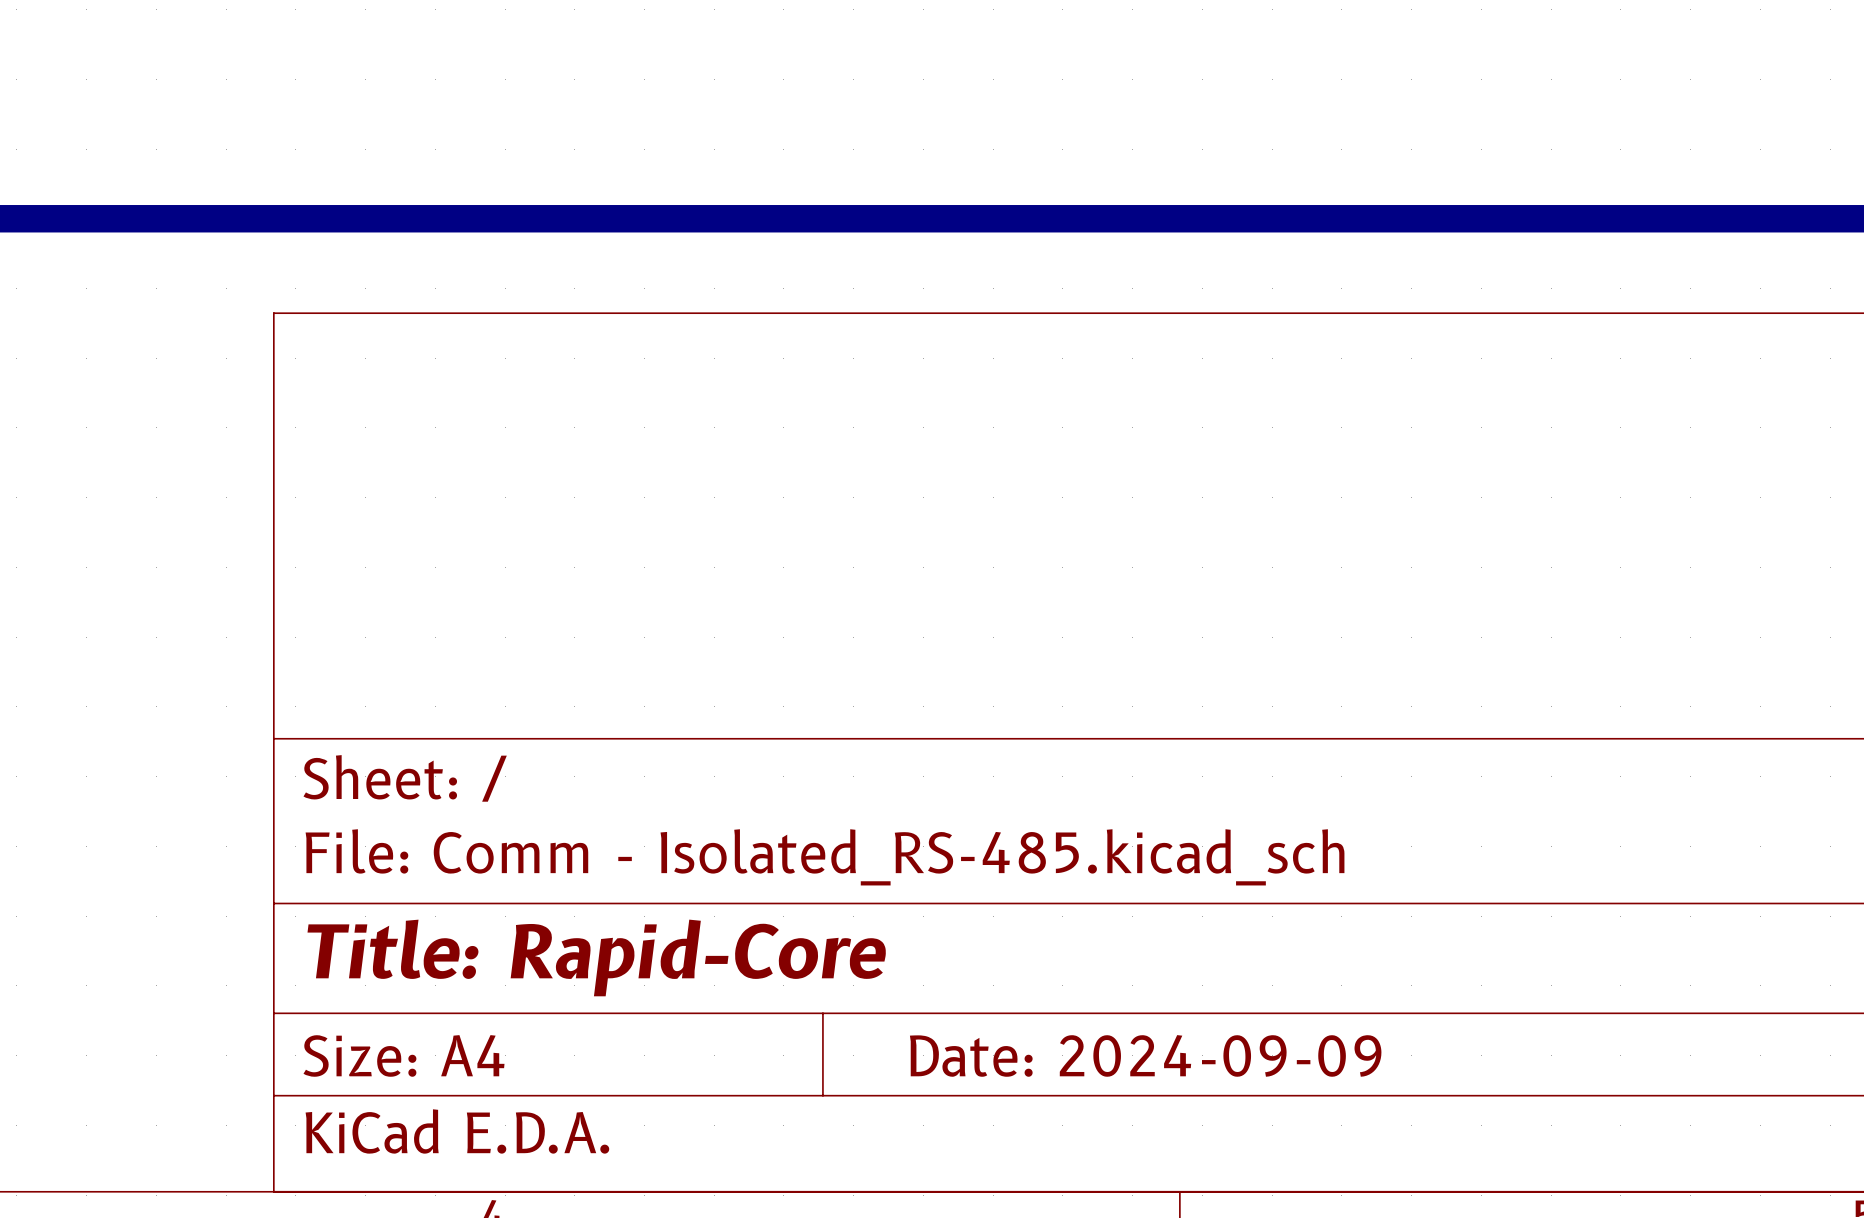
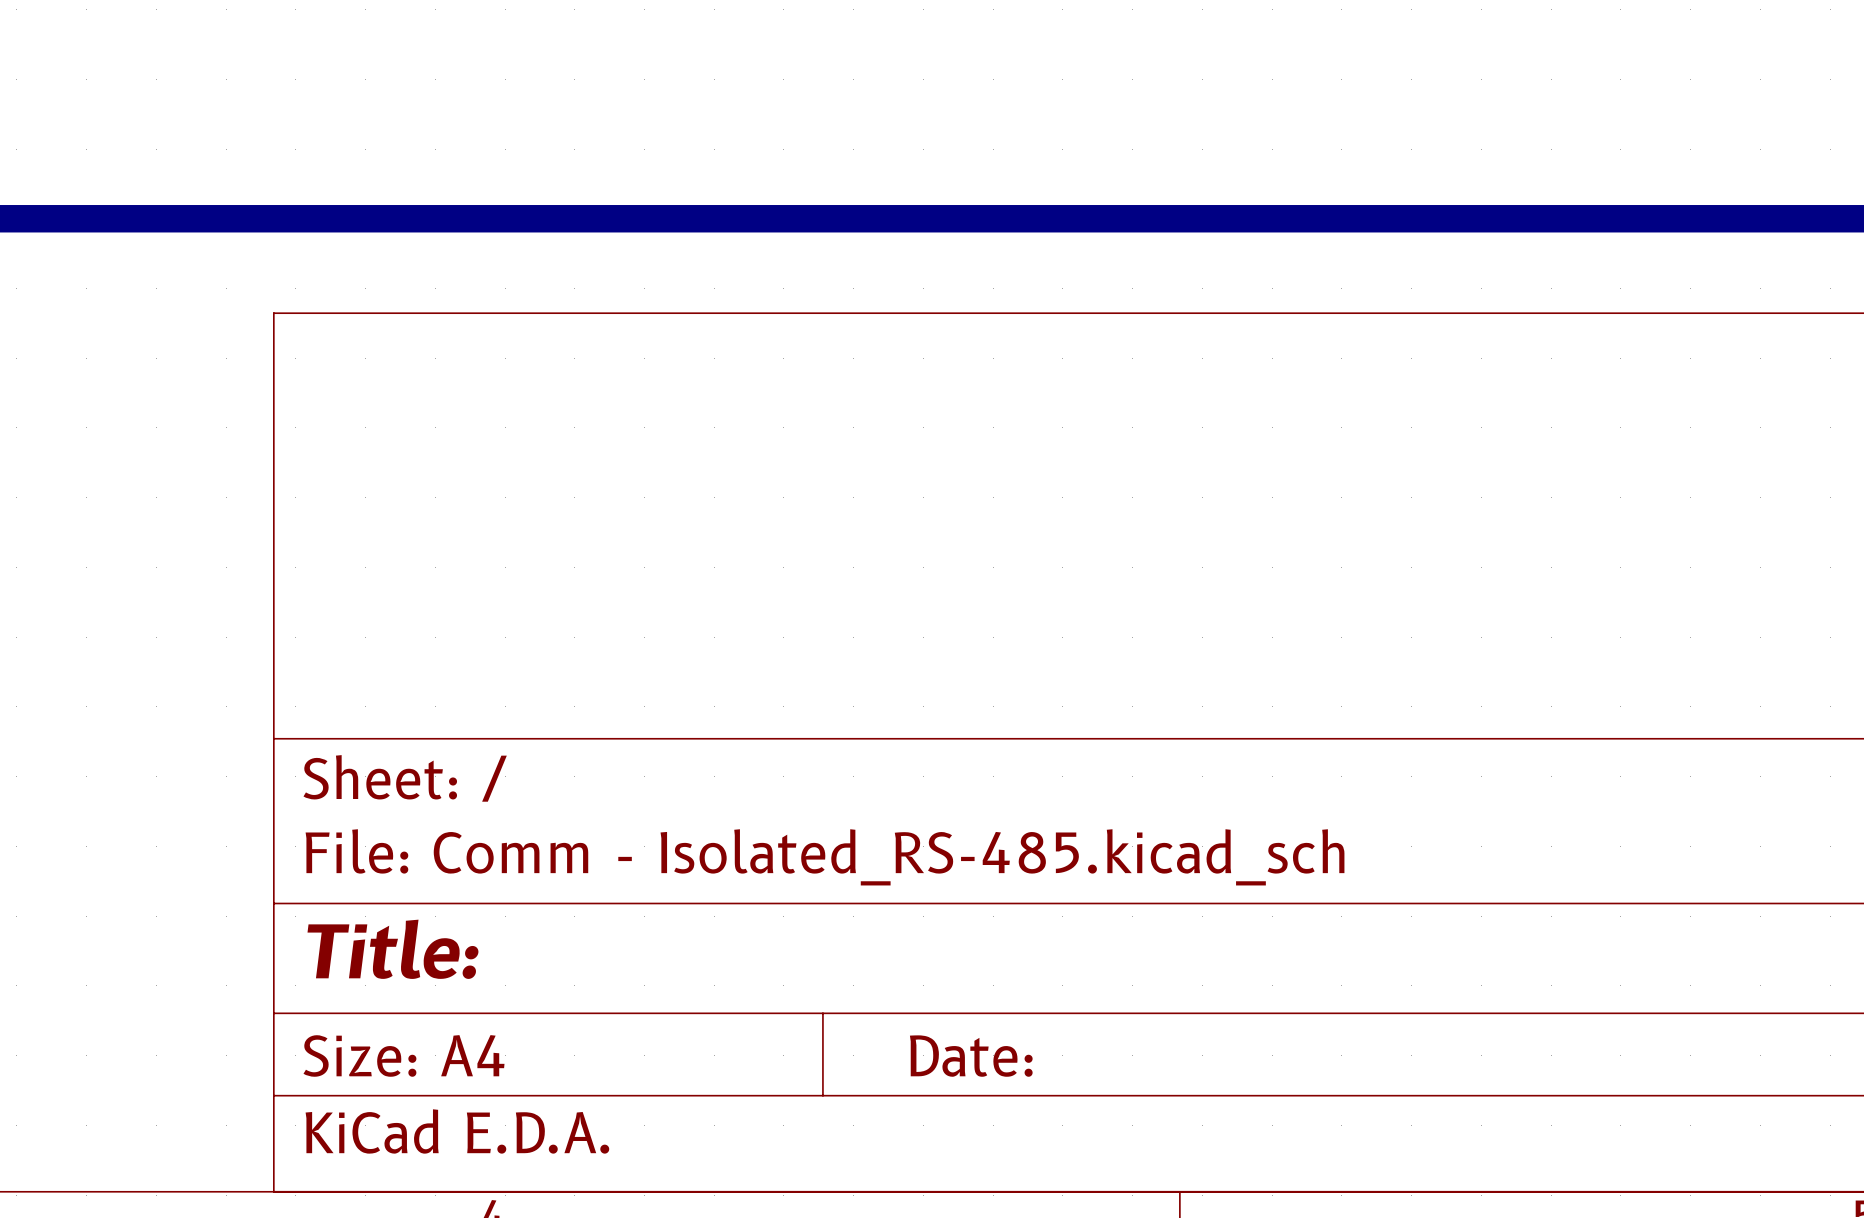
title block: Title: Rapid-Core (596, 957) -> Title: (393, 949)
title block: Date: 2024-09-09 (1145, 1055) -> Date: (971, 1056)

